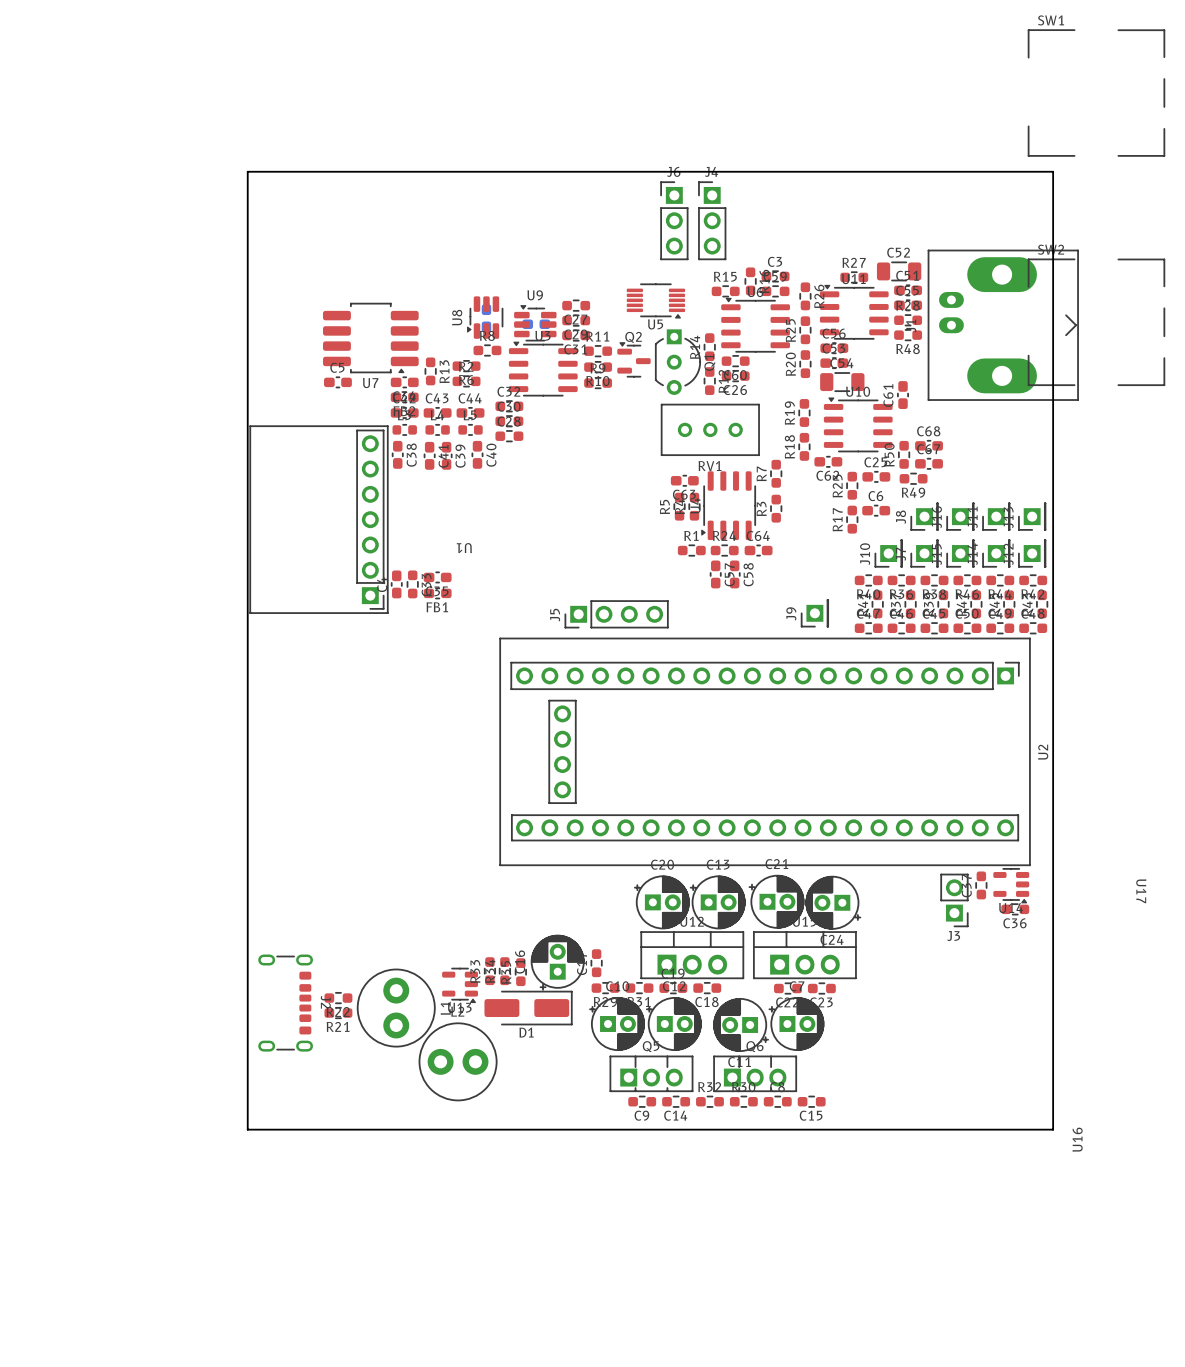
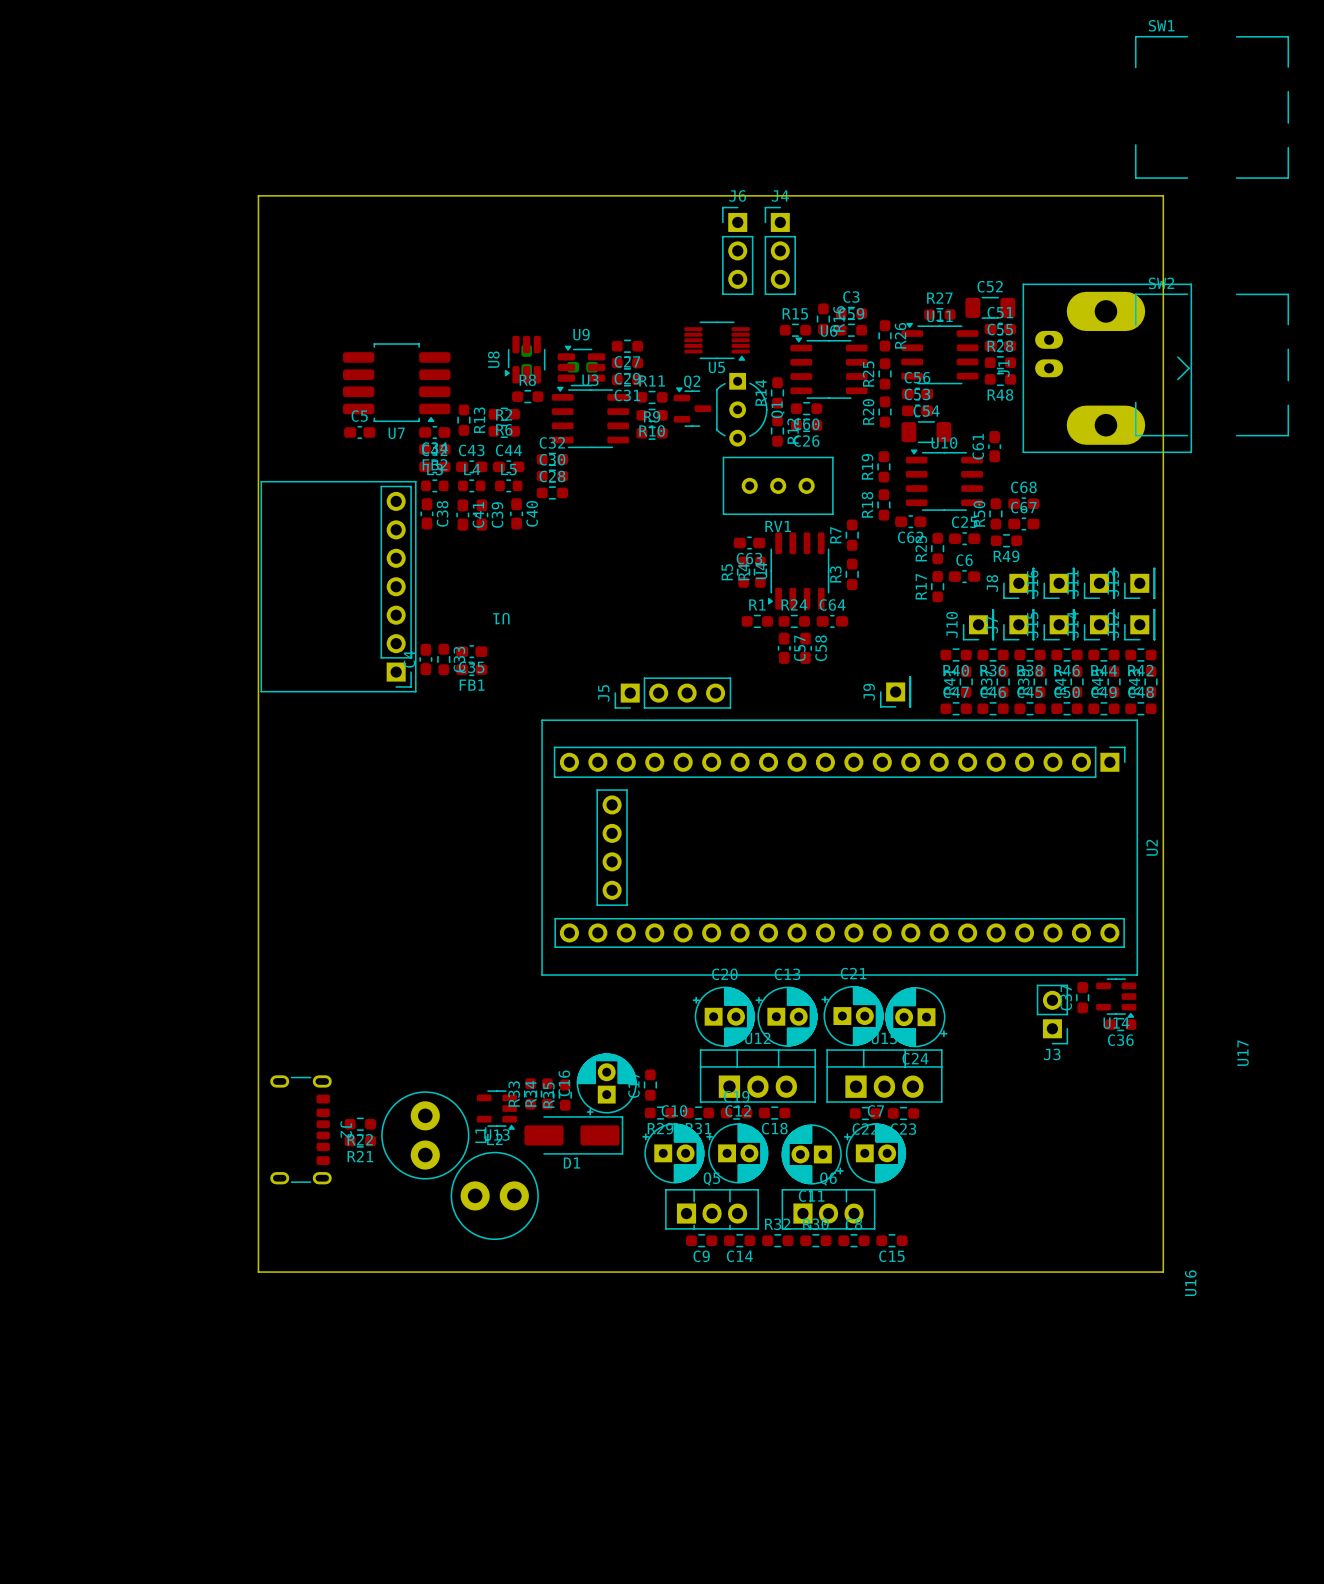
U17 position: (1141, 891) -> (1243, 1053)
U17 name rotation: 0° (1141, 891) -> 180° (1243, 1053)

